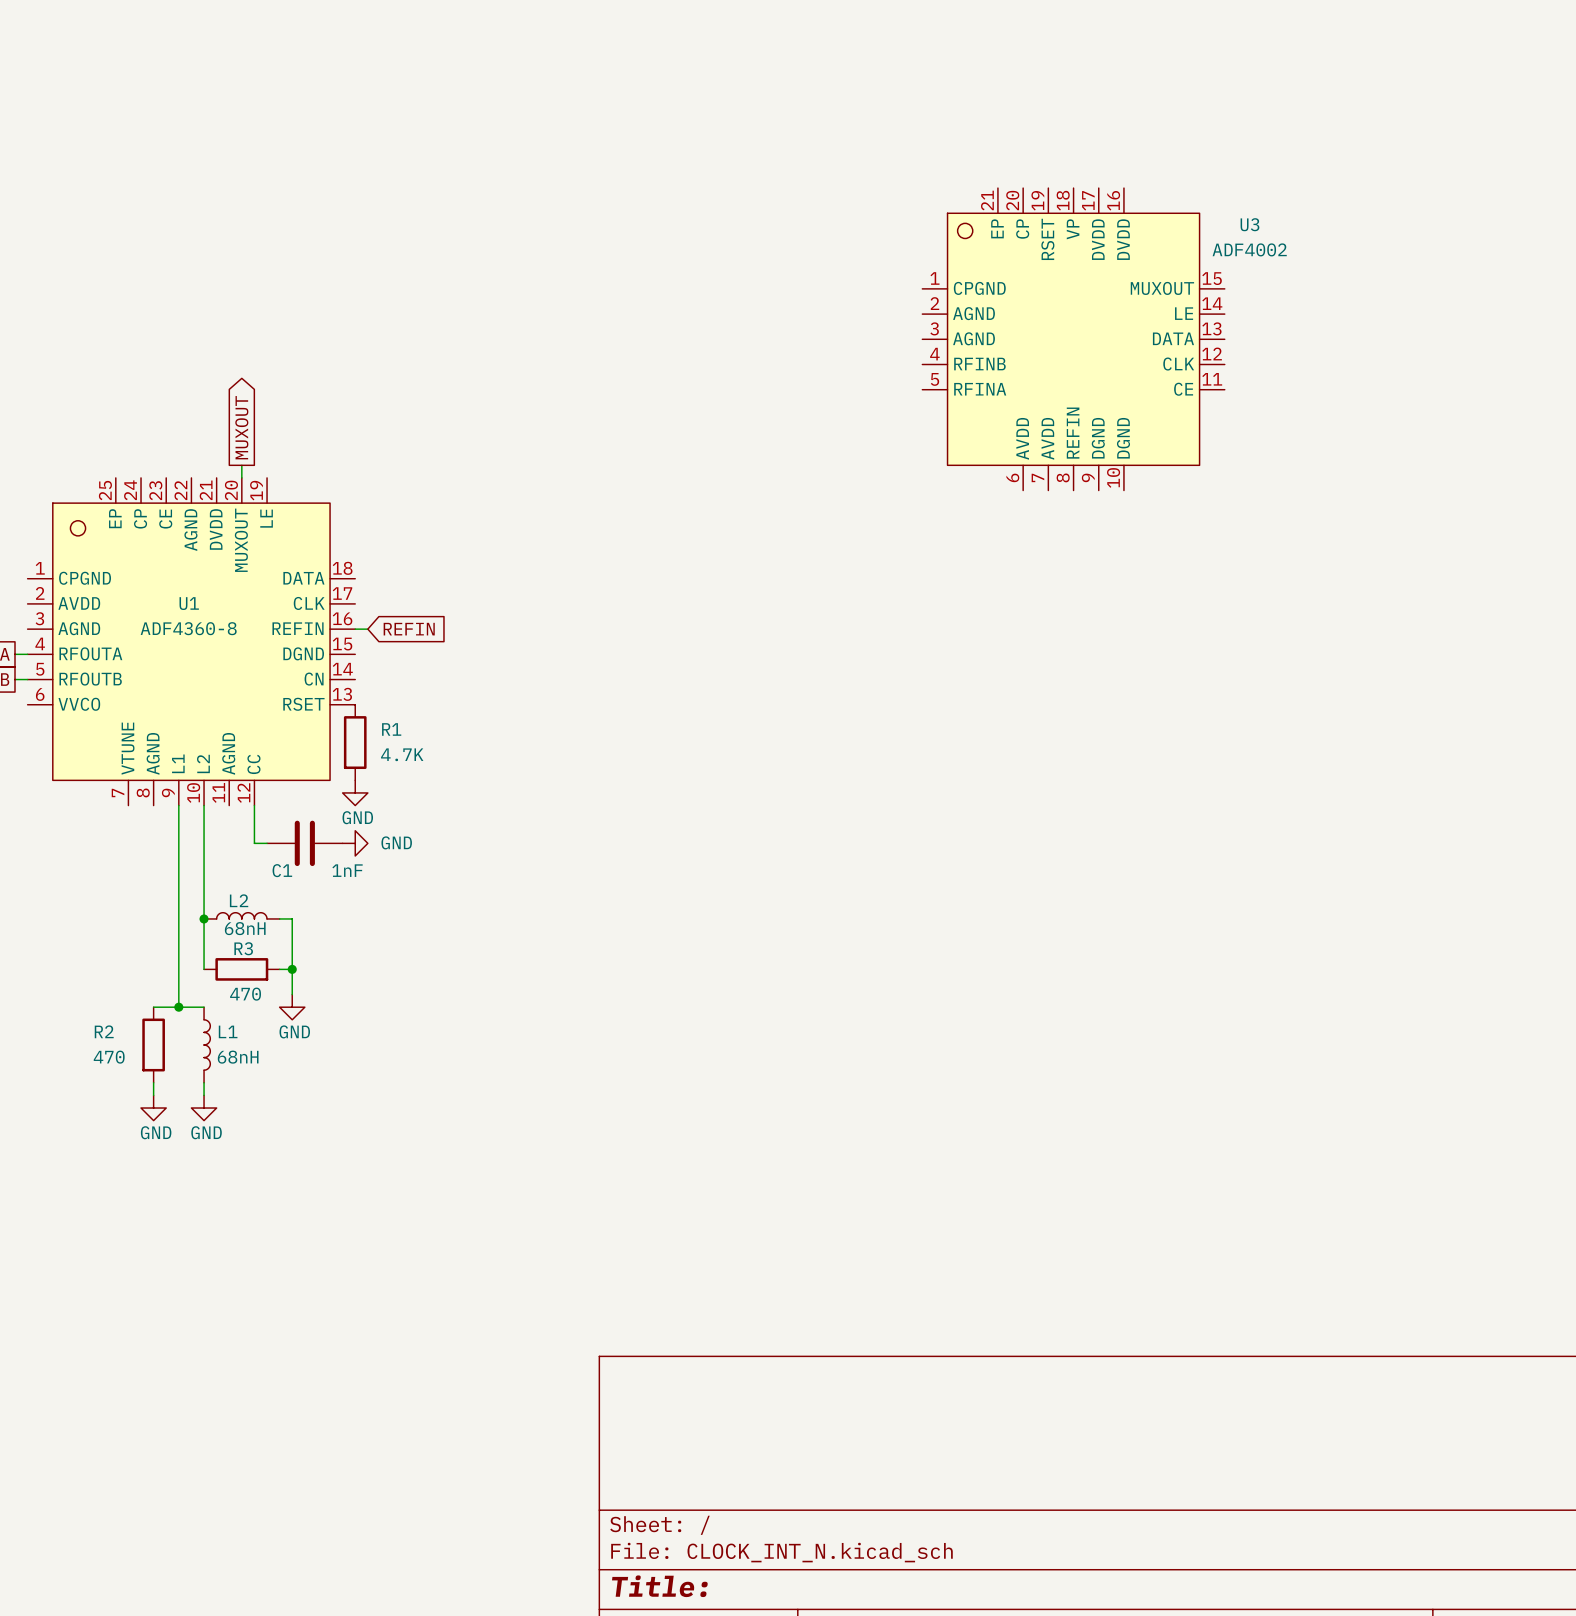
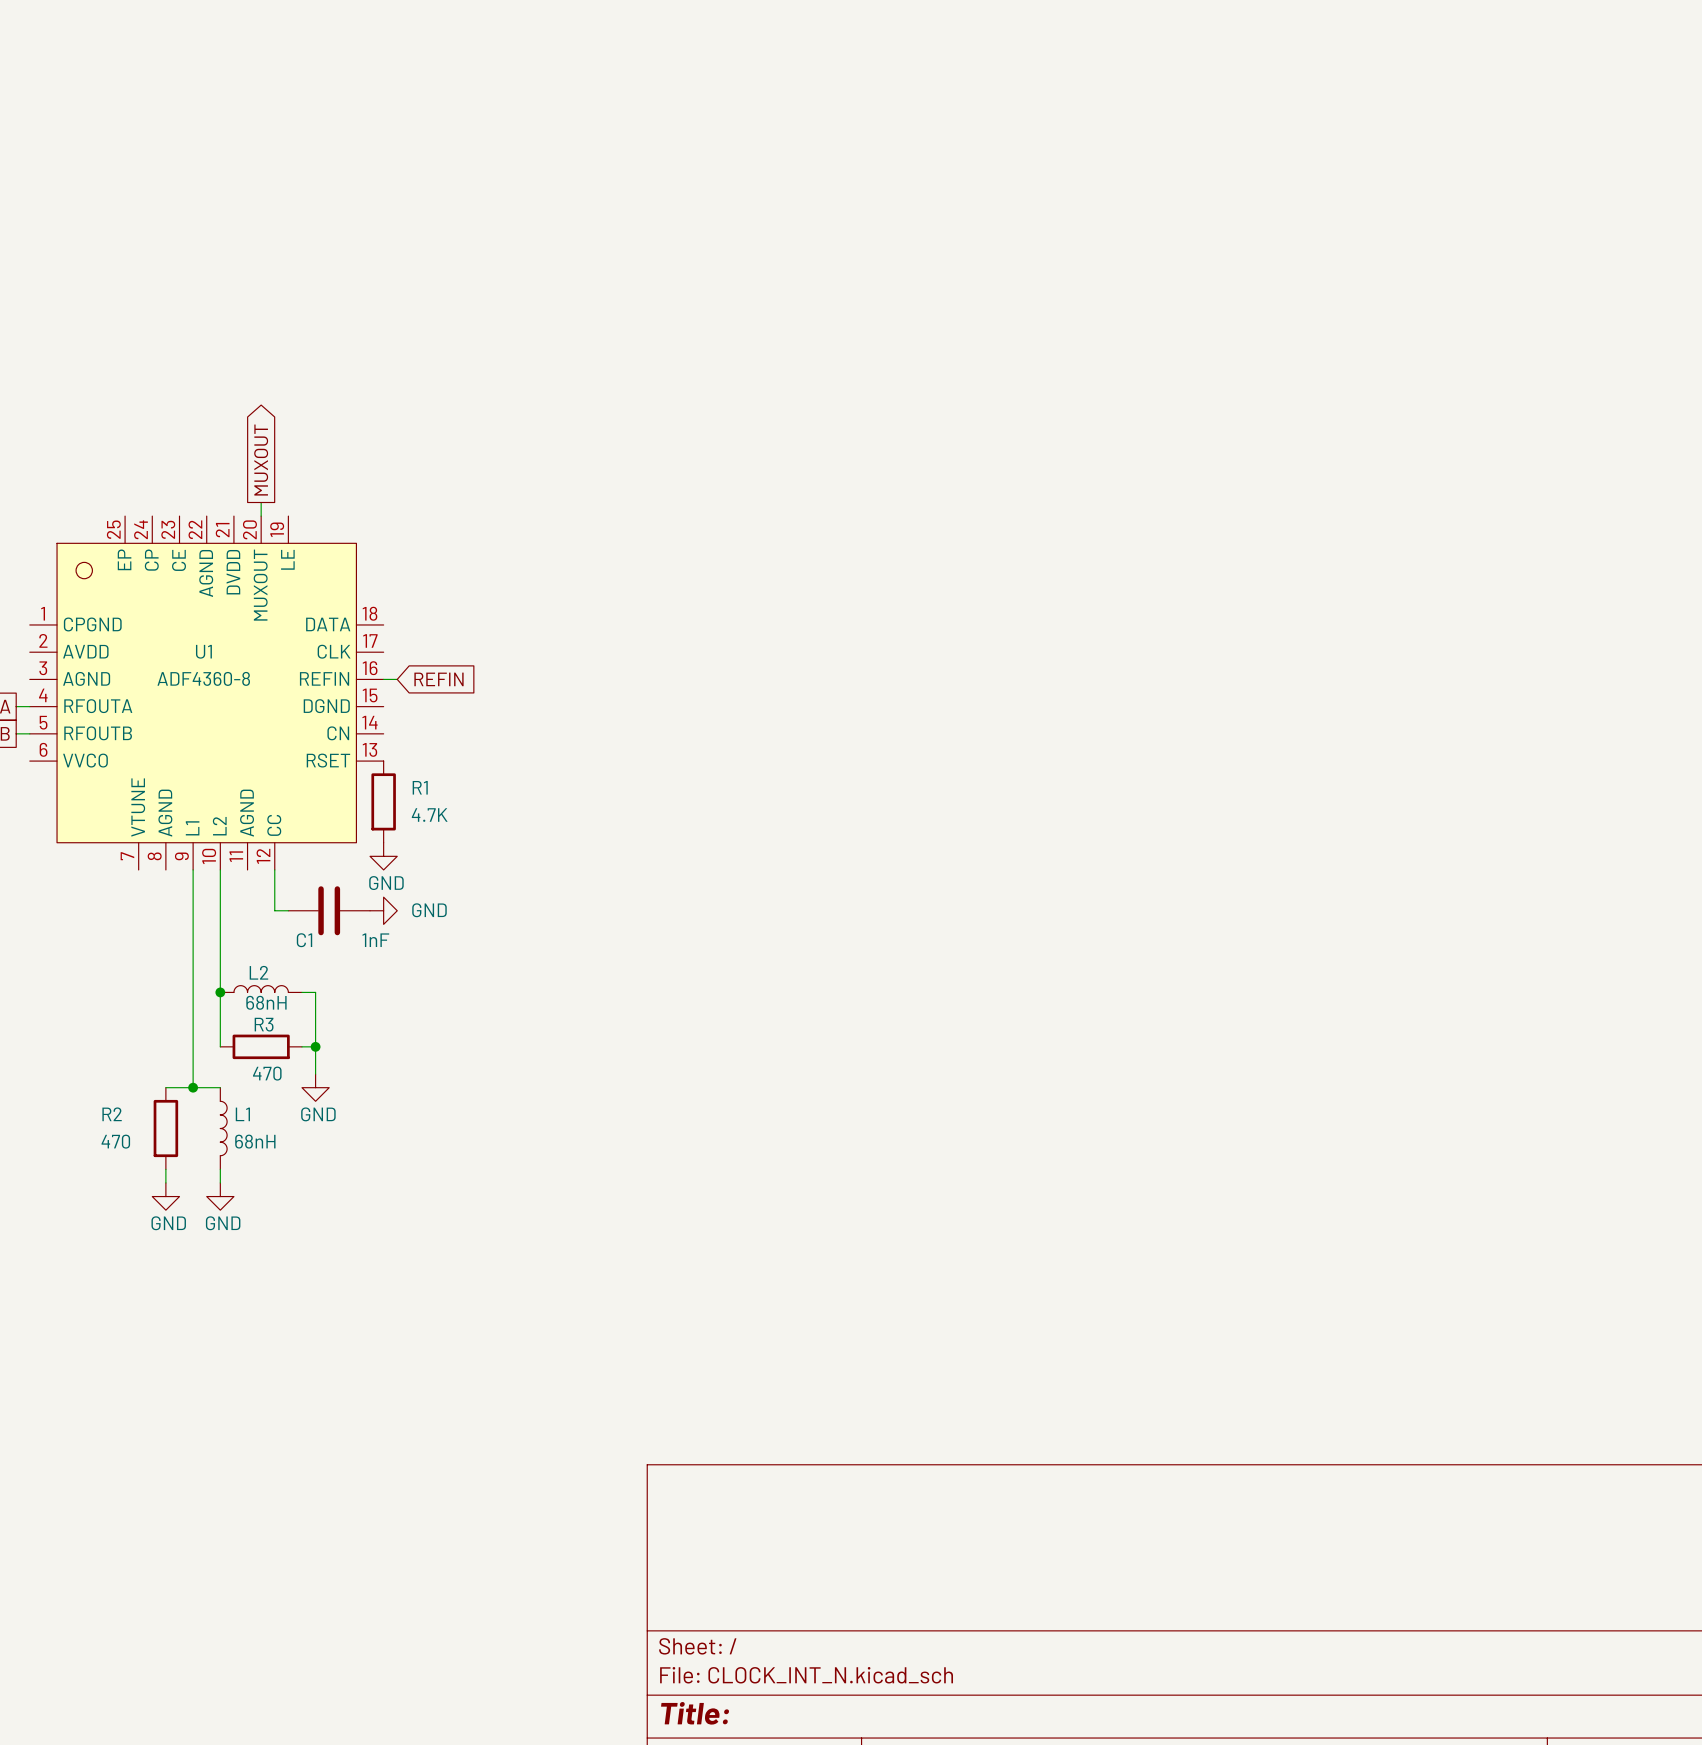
U3: ADF4002 (1073, 339) -> none

